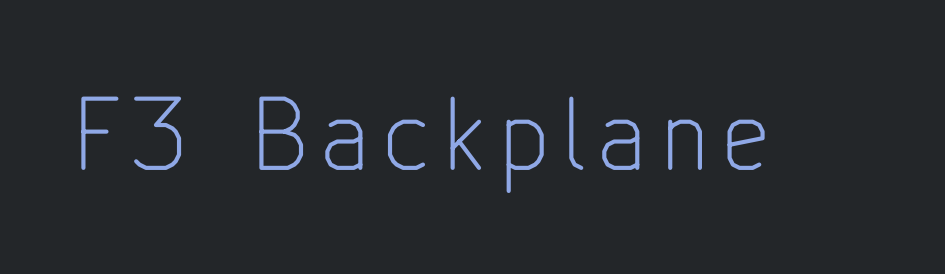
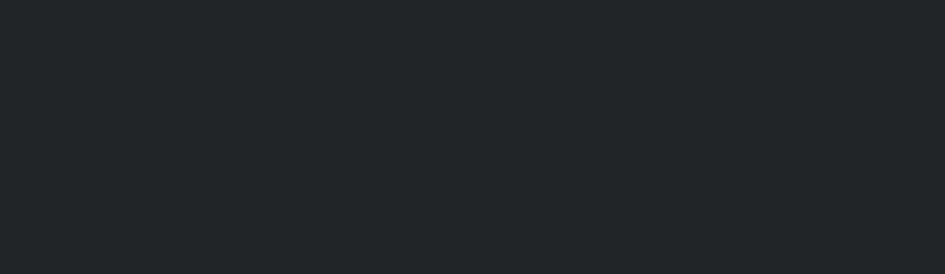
text: F3 Backplane (422, 144) -> none

